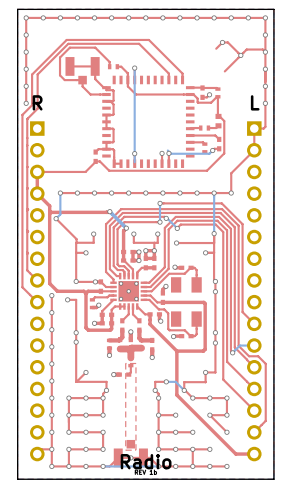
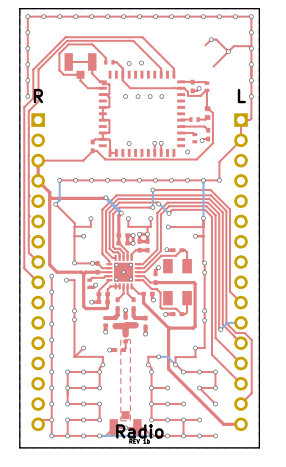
via: none -> (141, 62)
bottom track: (134, 68) (134, 162) -> none
via: none -> (125, 96)
via: none -> (138, 96)
via: none -> (150, 96)
via: none -> (161, 96)
bottom track: (212, 150) (209, 153) (171, 153) (167, 150) -> none
via: none -> (187, 151)

